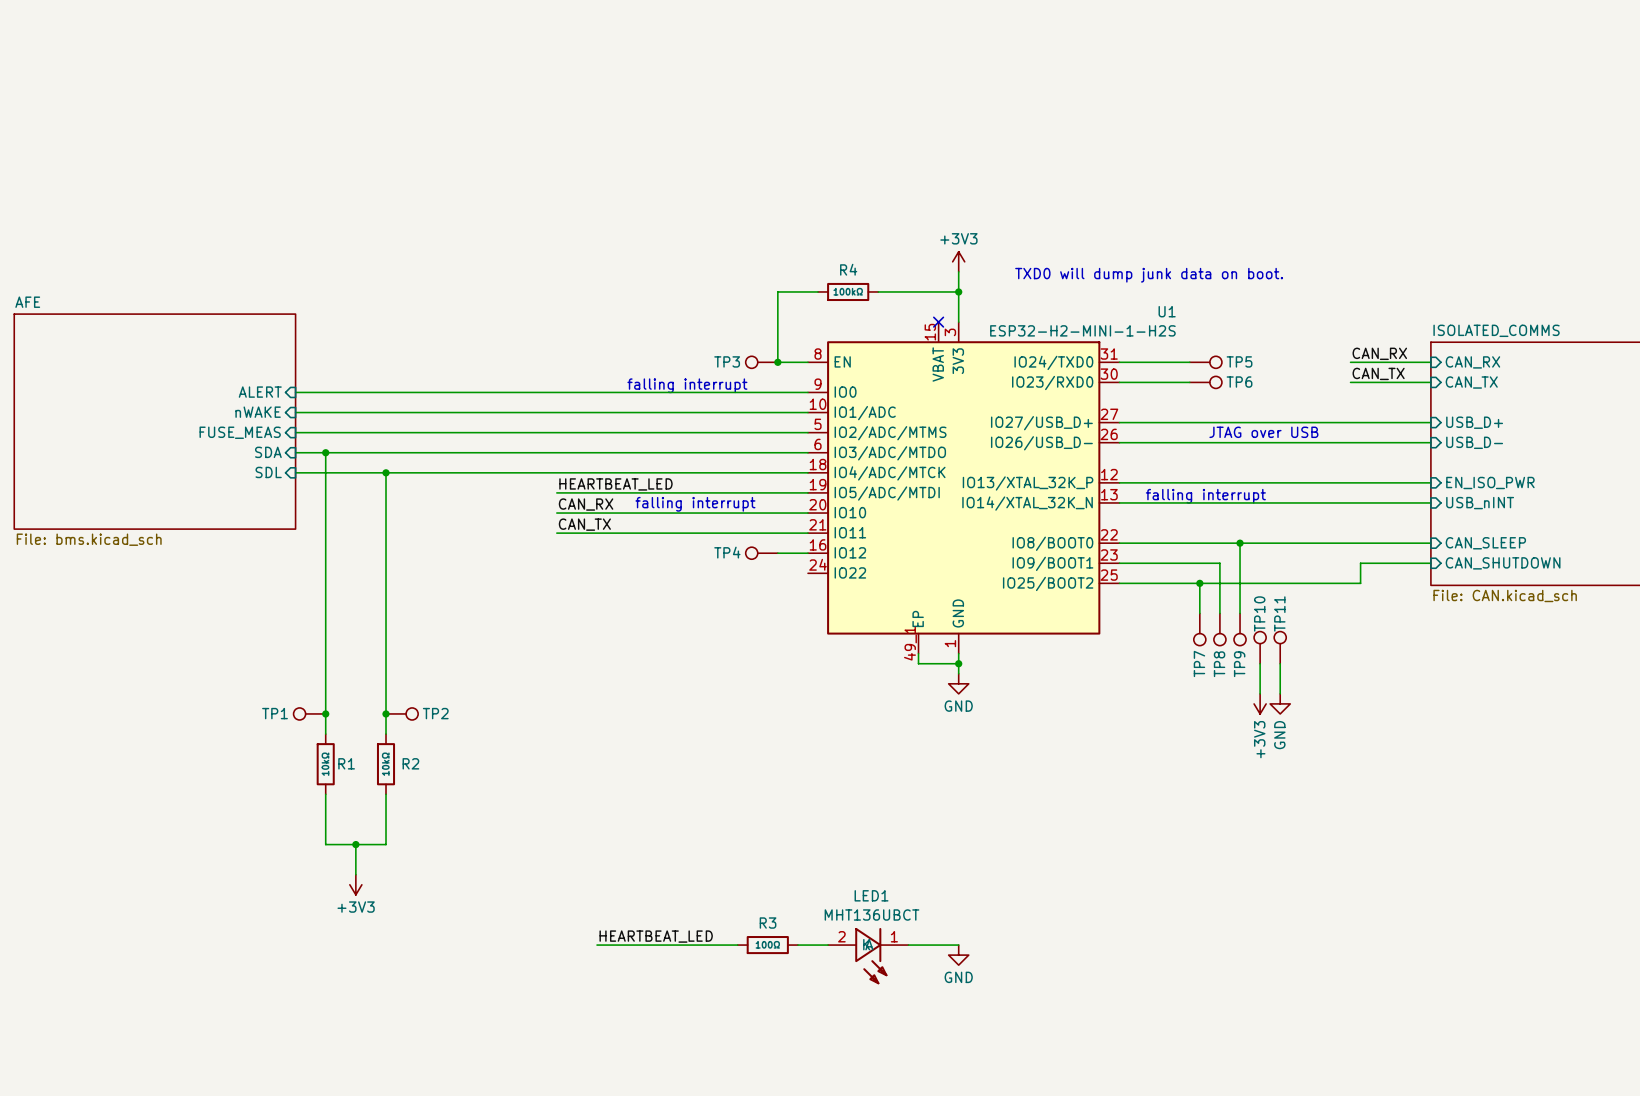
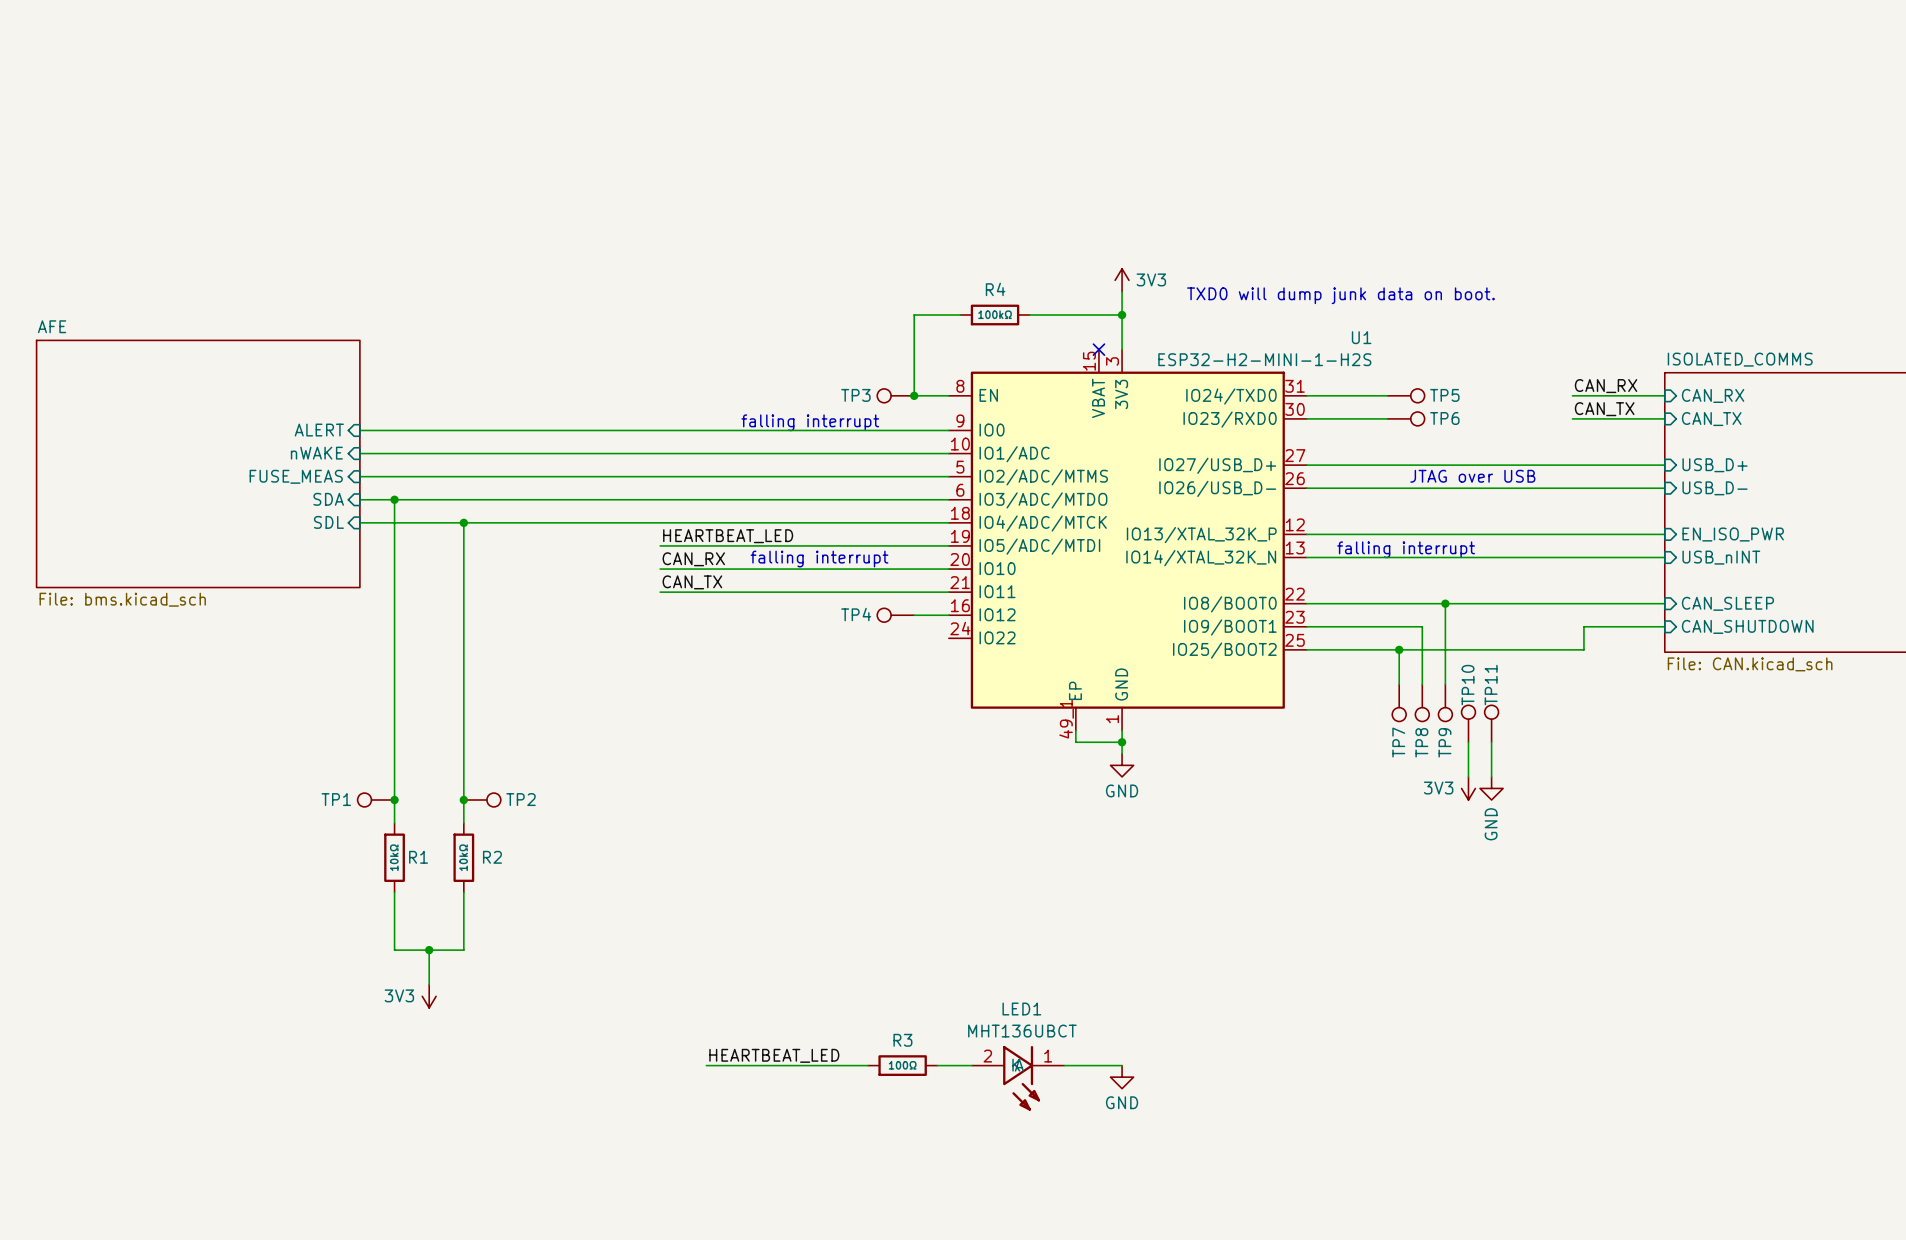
power symbol: +3V3 (958, 261) -> 3V3 (1122, 280)
power symbol: +3V3 (1260, 703) -> 3V3 (1468, 788)
power symbol: +3V3 (355, 884) -> 3V3 (429, 996)

